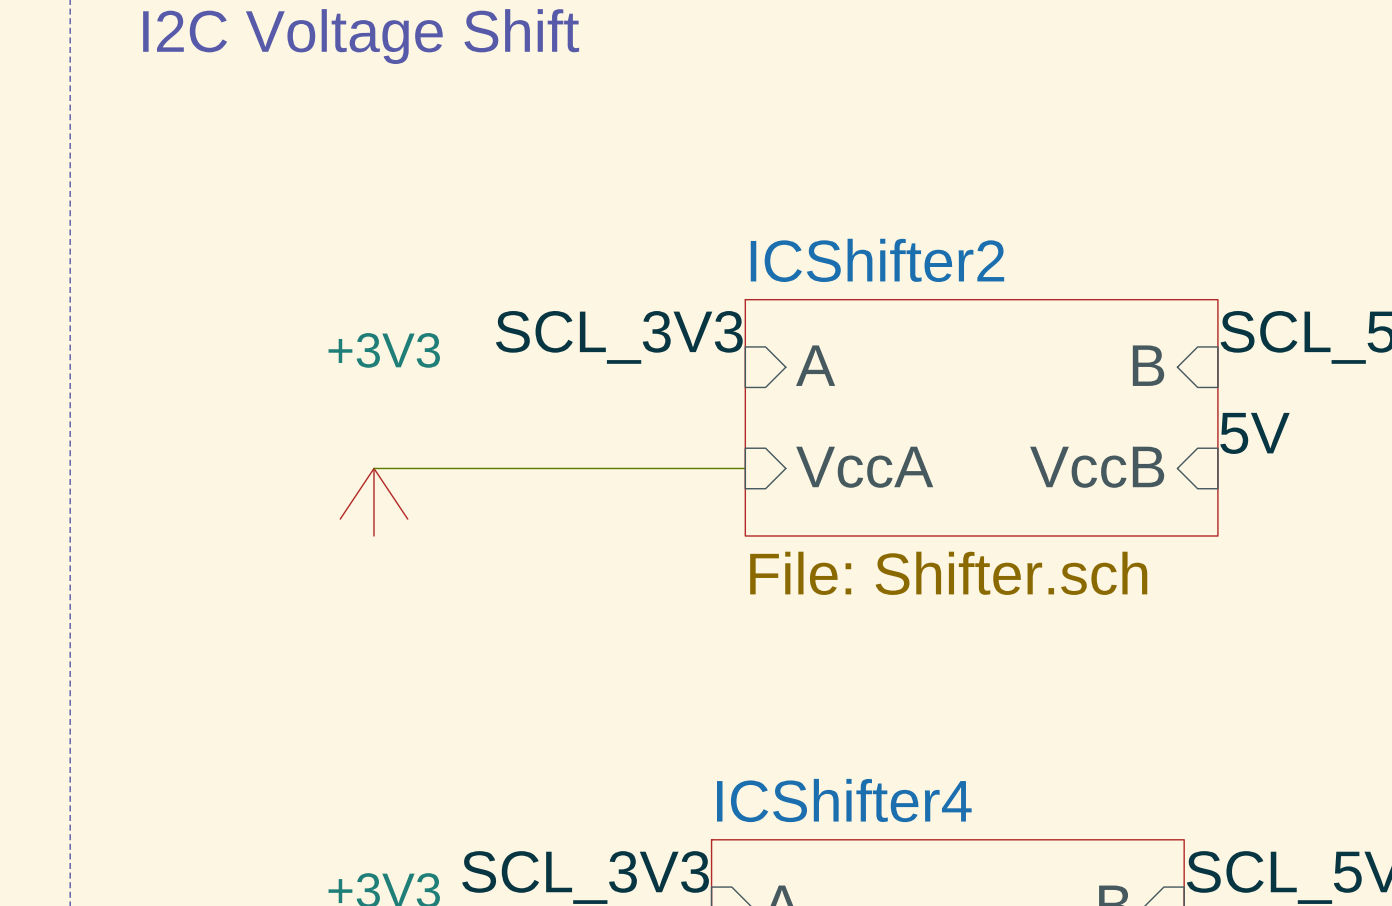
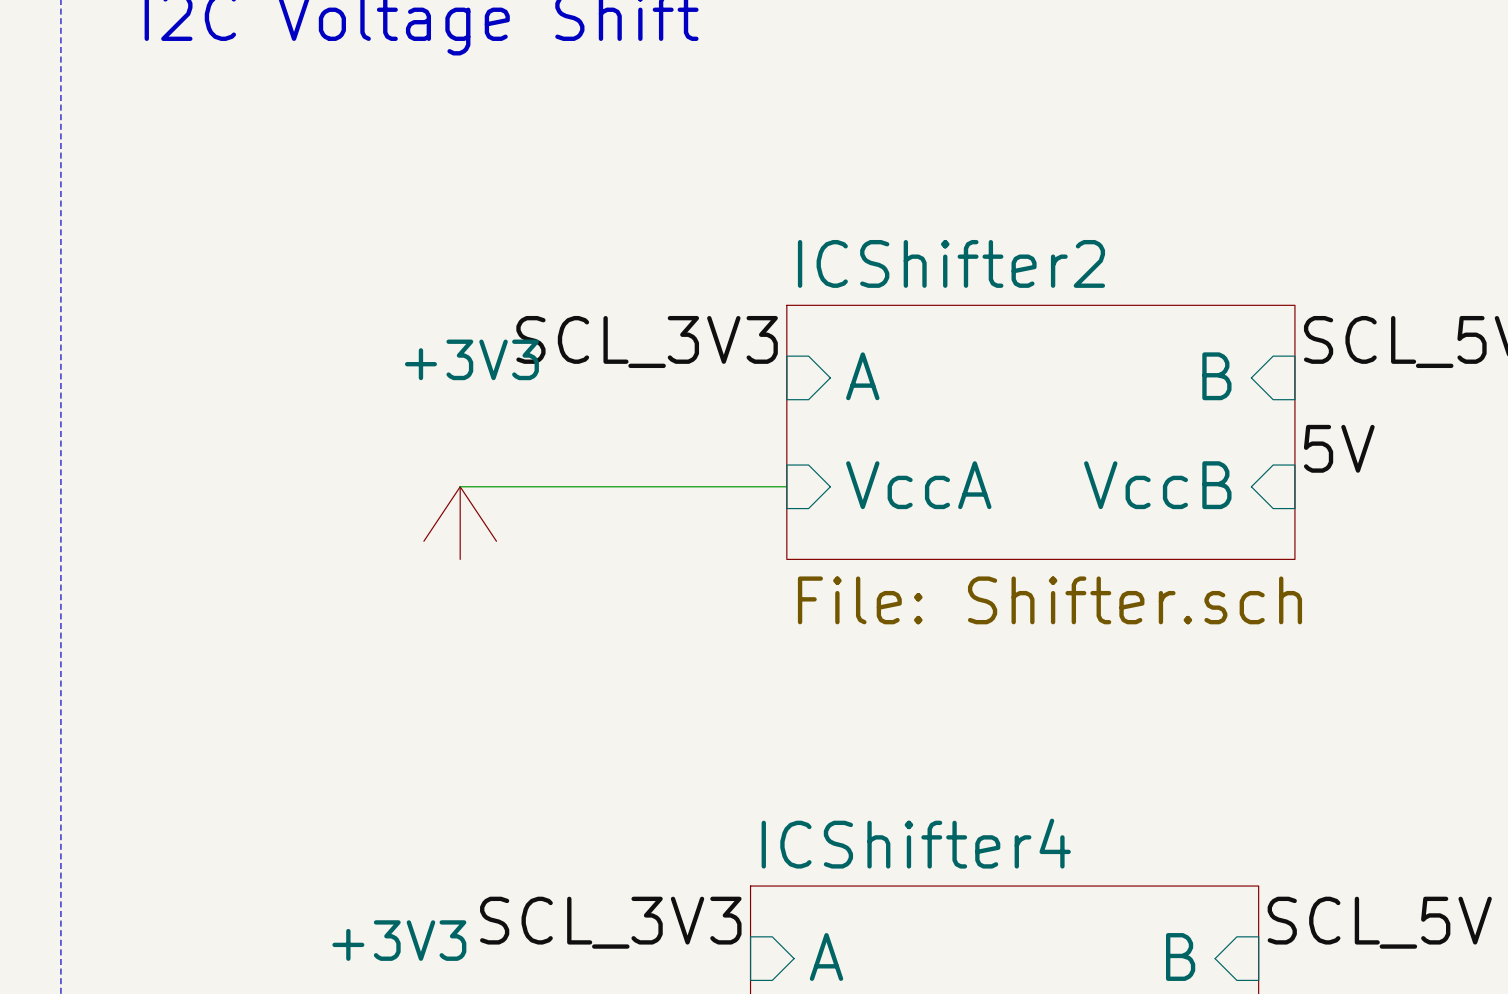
wire: (373, 468) (441, 468) -> none
power symbol position: +3V3 (373, 502) -> +3V3 (460, 523)

